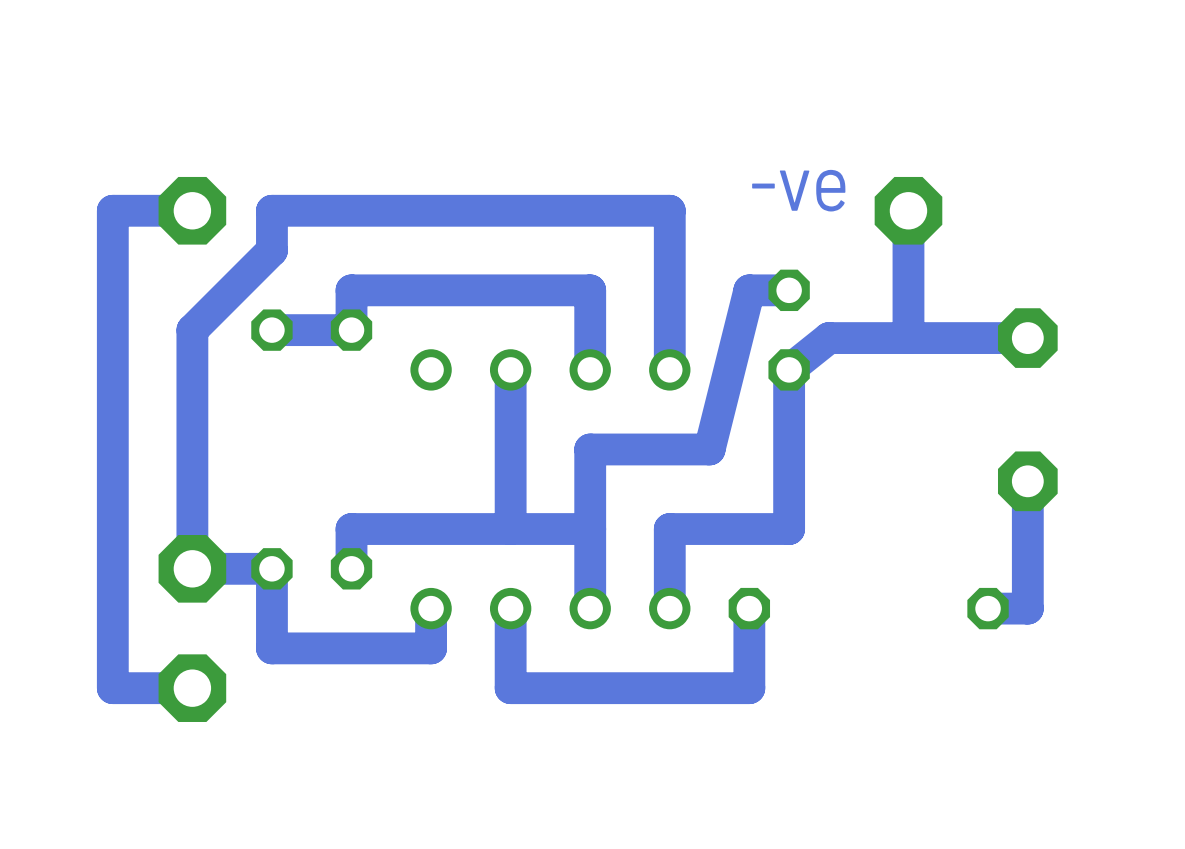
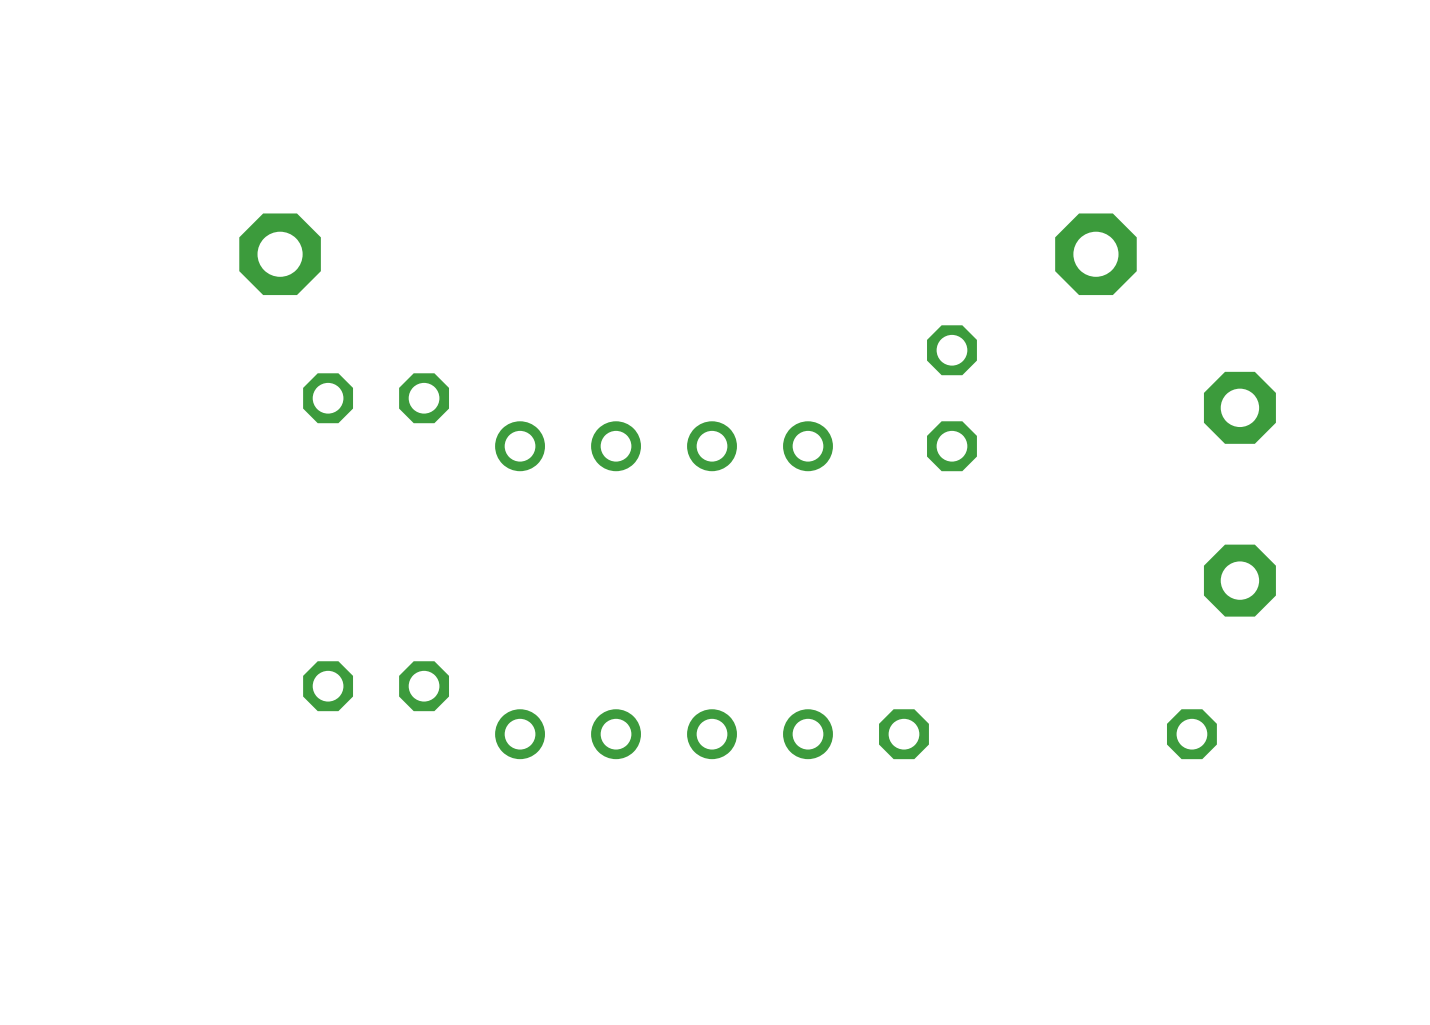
text: -ve (798, 190) -> none
track: (192, 210) (112, 210) (112, 688) (192, 688) -> none
part position: (192, 210) -> (280, 254)
track: (908, 210) (908, 338) -> none
track: (789, 290) (749, 290) (709, 449) (590, 449) (590, 608) -> none
track: (271, 330) (351, 330) (351, 290) (590, 290) (590, 369) -> none
track: (1027, 338) (828, 338) (789, 369) (789, 529) (669, 529) (669, 608) -> none
track: (510, 369) (510, 529) -> none
track: (669, 369) (669, 210) (271, 210) (271, 250) (192, 330) (192, 568) (271, 568) (271, 648) (431, 648) (431, 608) -> none
track: (1027, 481) (1027, 608) (988, 608) -> none
track: (590, 529) (351, 529) (351, 568) -> none
part: (192, 568) -> none
track: (749, 608) (749, 688) (510, 688) (510, 608) -> none
part: (192, 688) -> none

